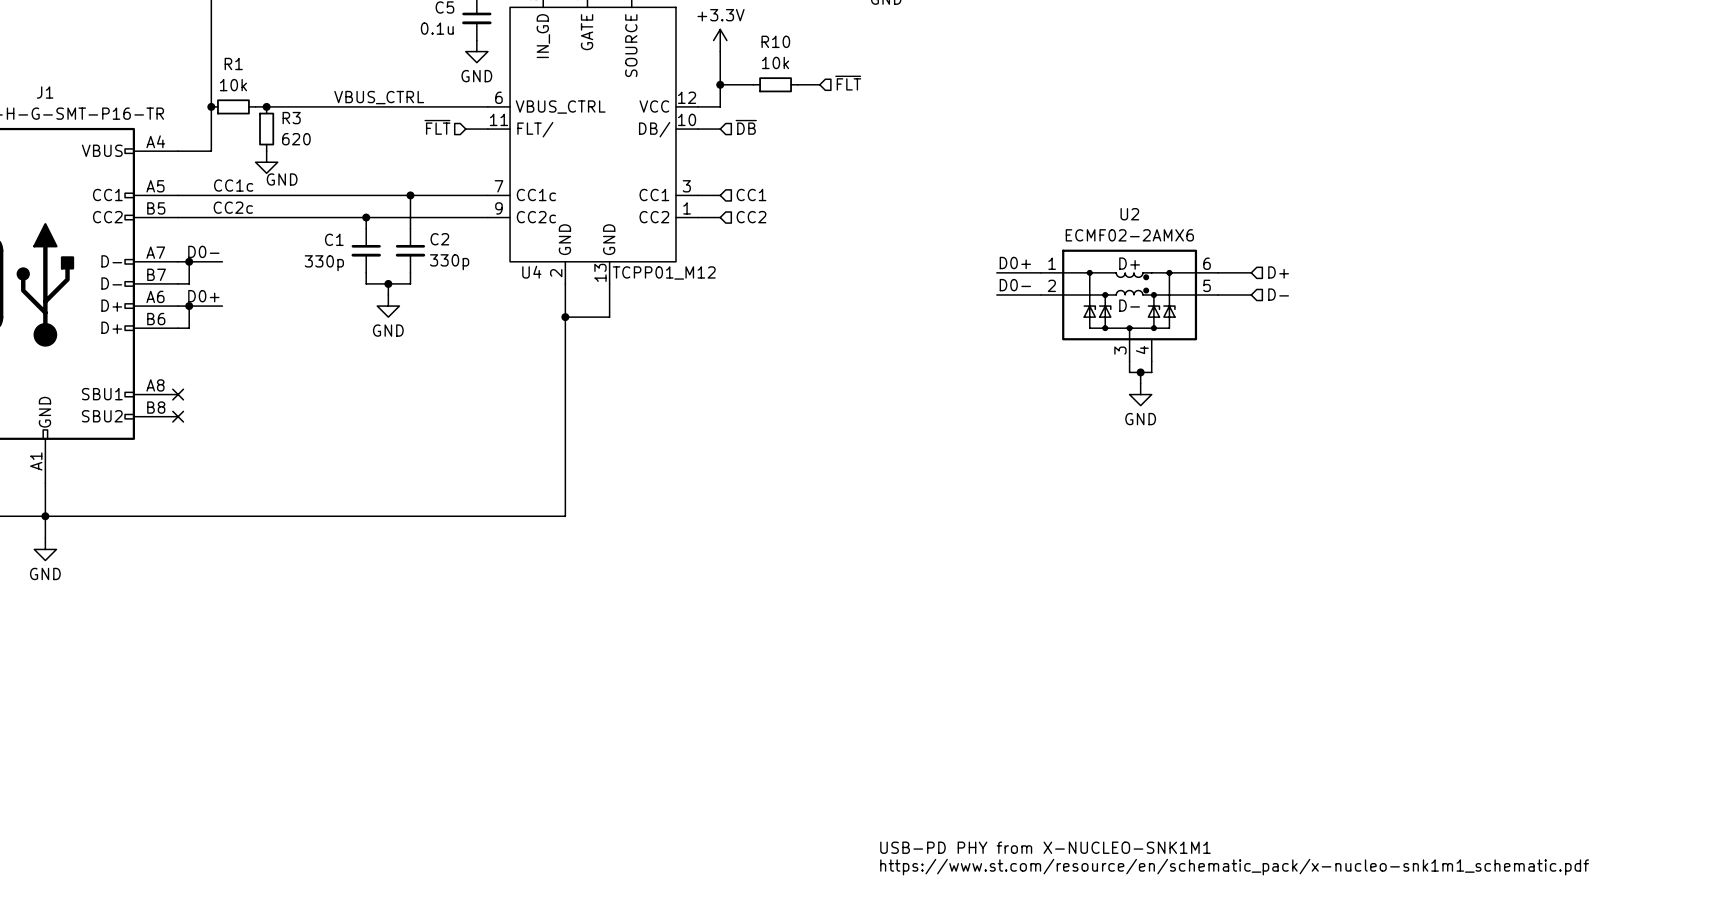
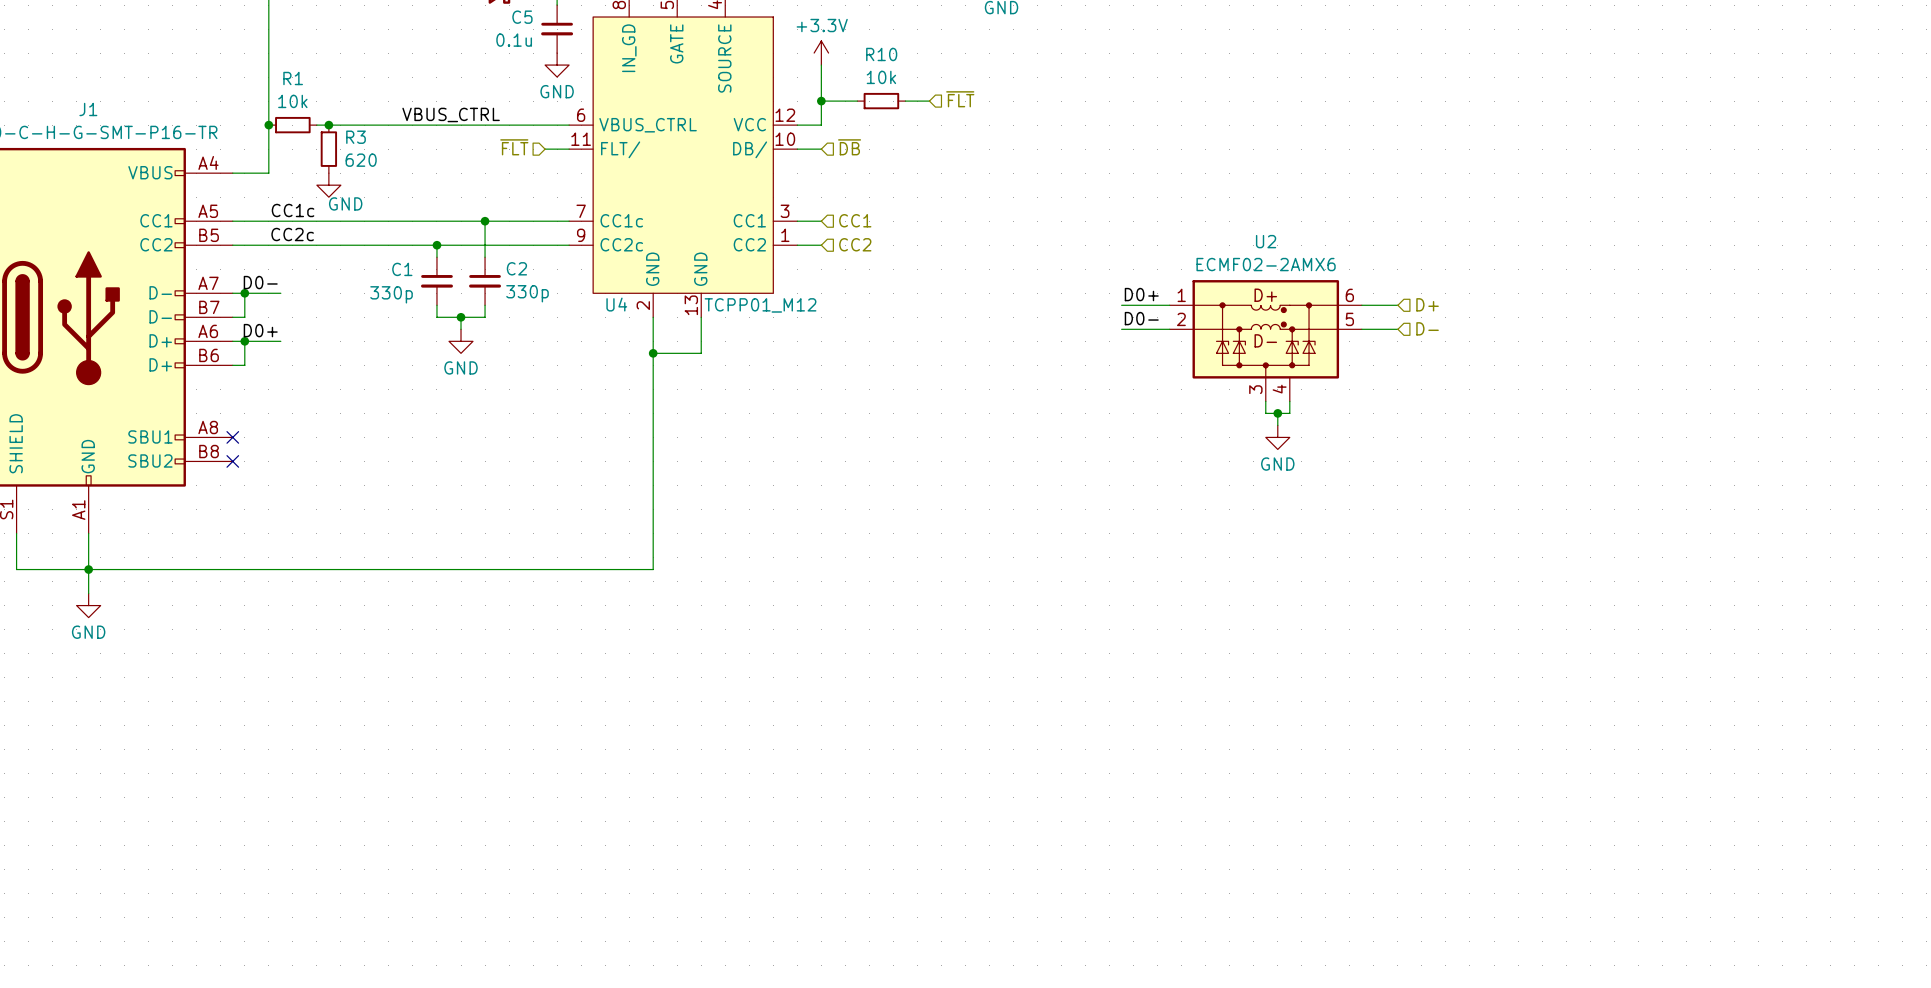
text: USB-PD PHY from X-NUCLEO-SNK1M1 (1045, 847) -> none
text: https://www.st.com/resource/en/schematic_pack/x-nucleo-snk1m1_schematic.pdf (1234, 867) -> none

